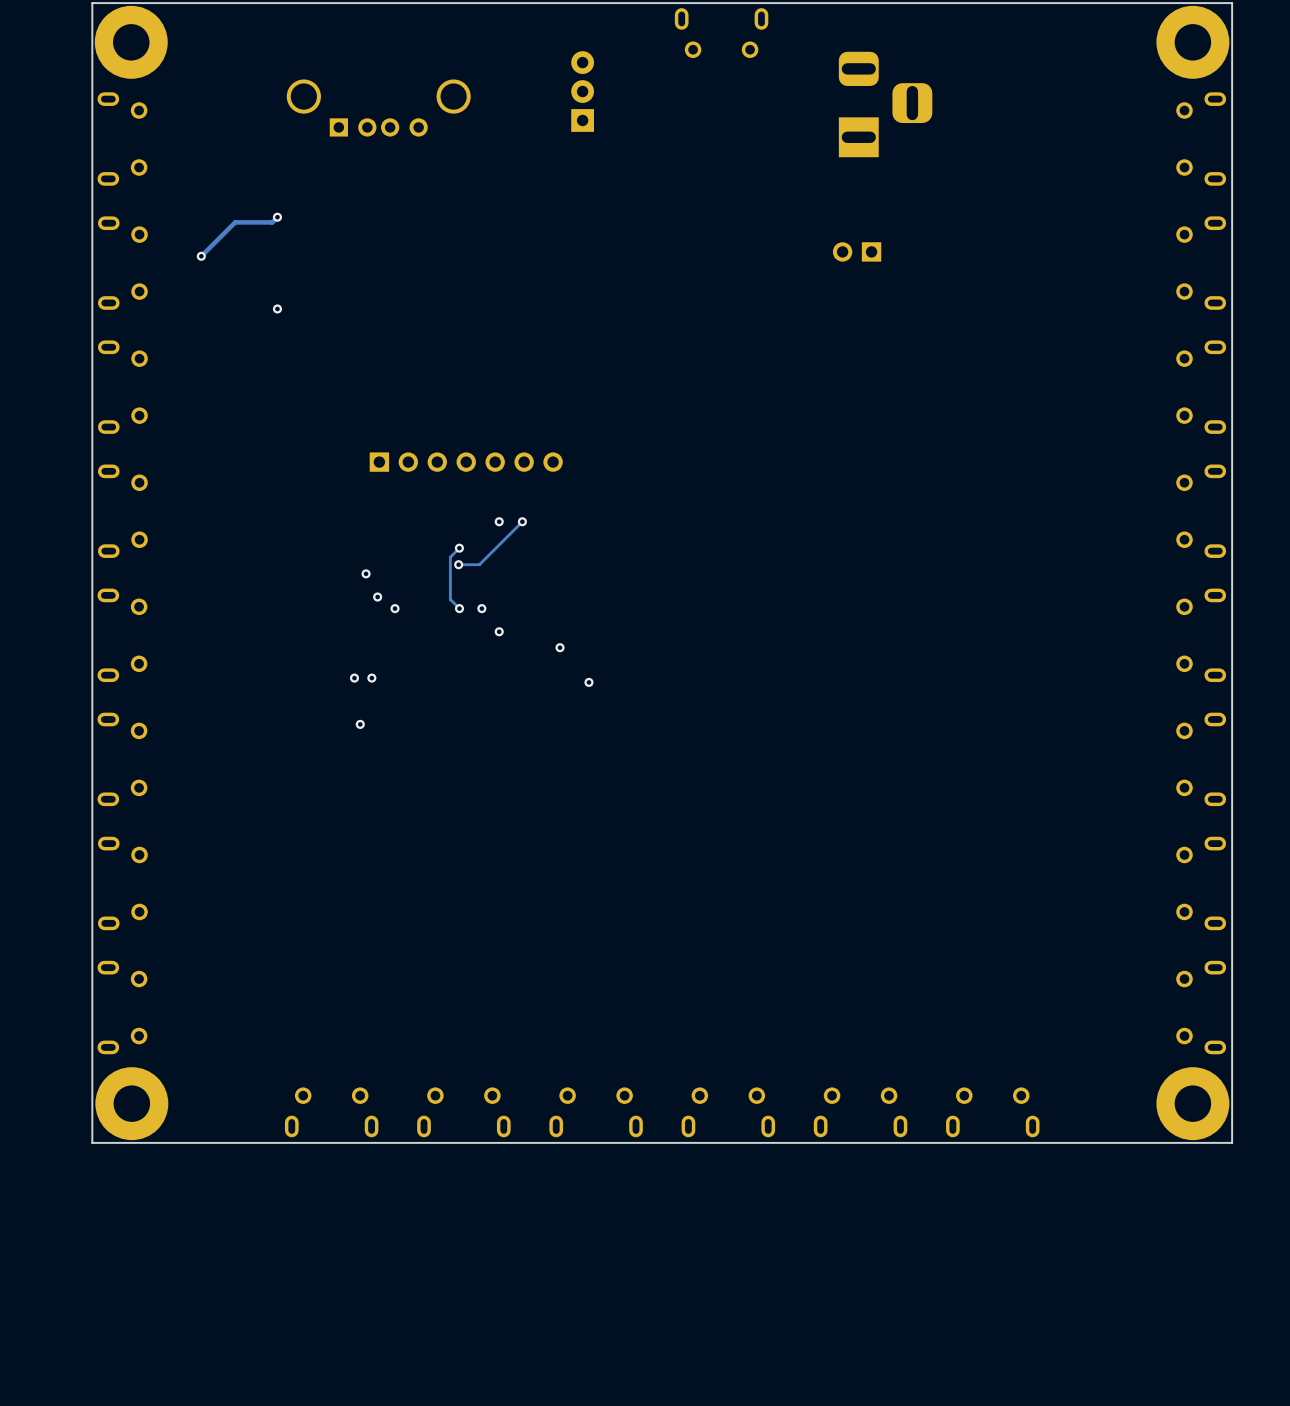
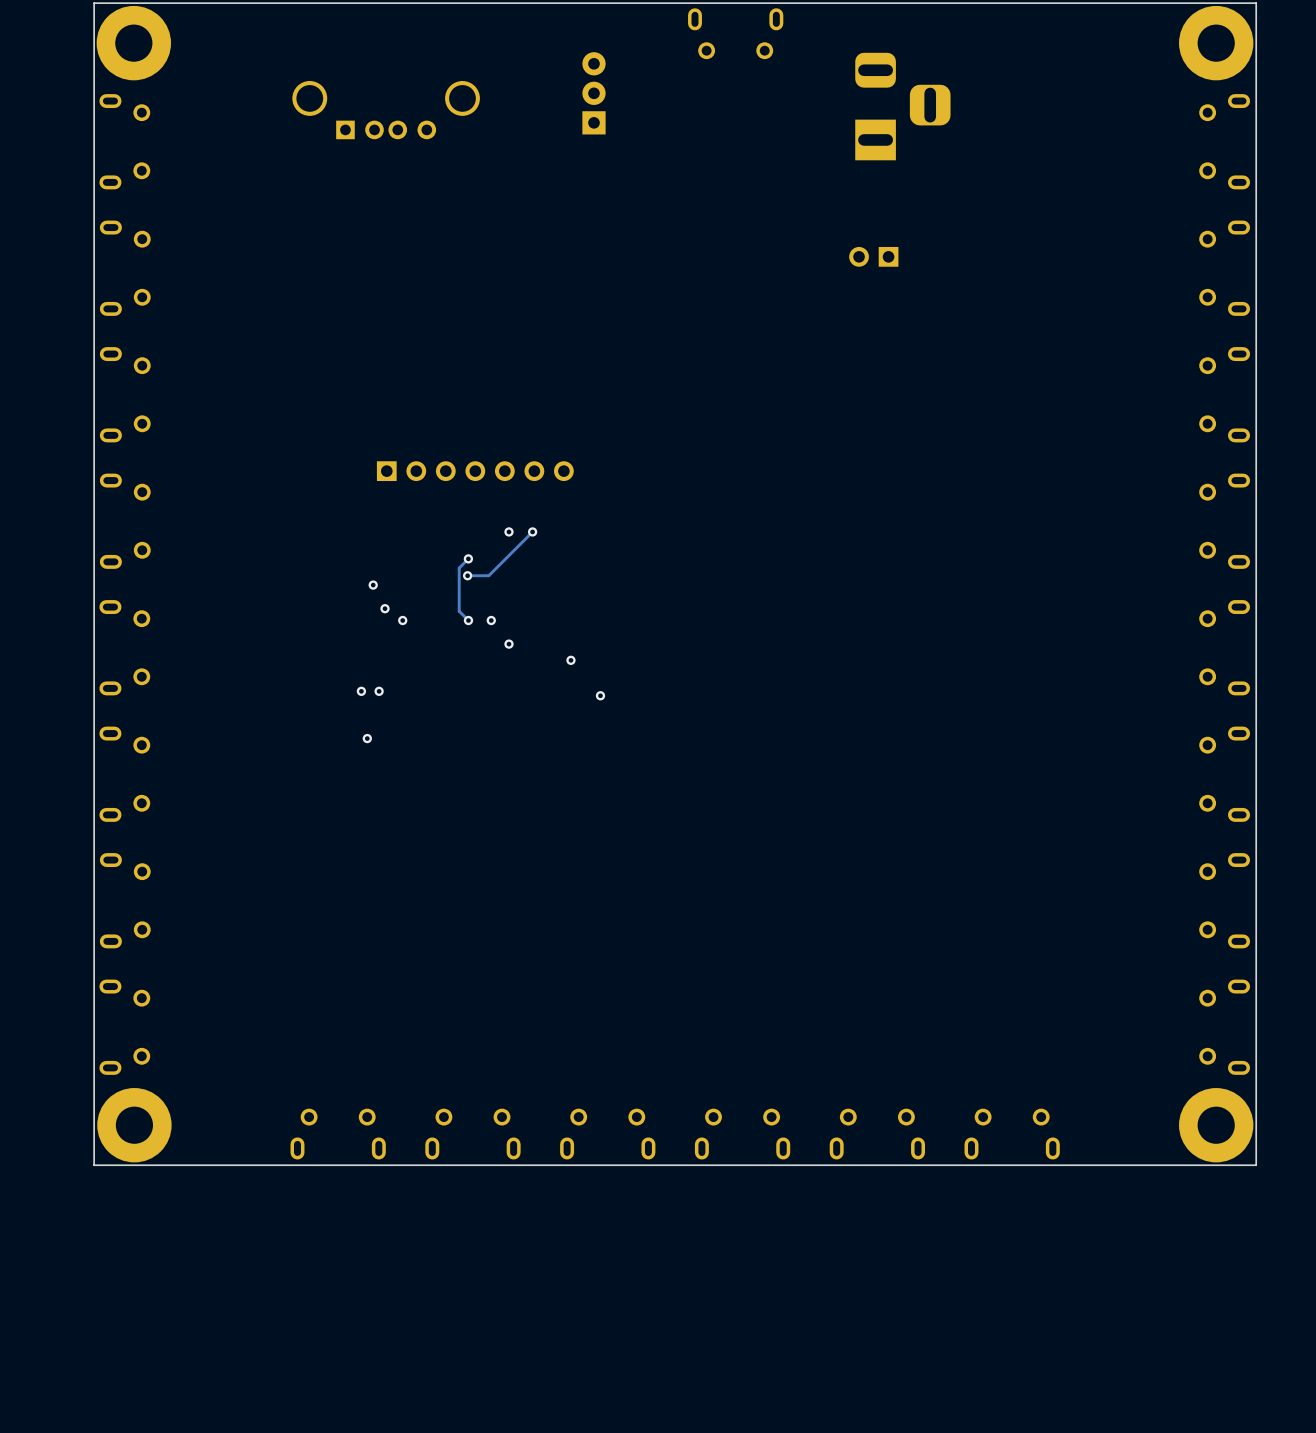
track: (277, 217) (272, 222) (235, 222) (201, 256) -> none
via: (277, 217) -> none
via: (201, 256) -> none
via: (277, 308) -> none

